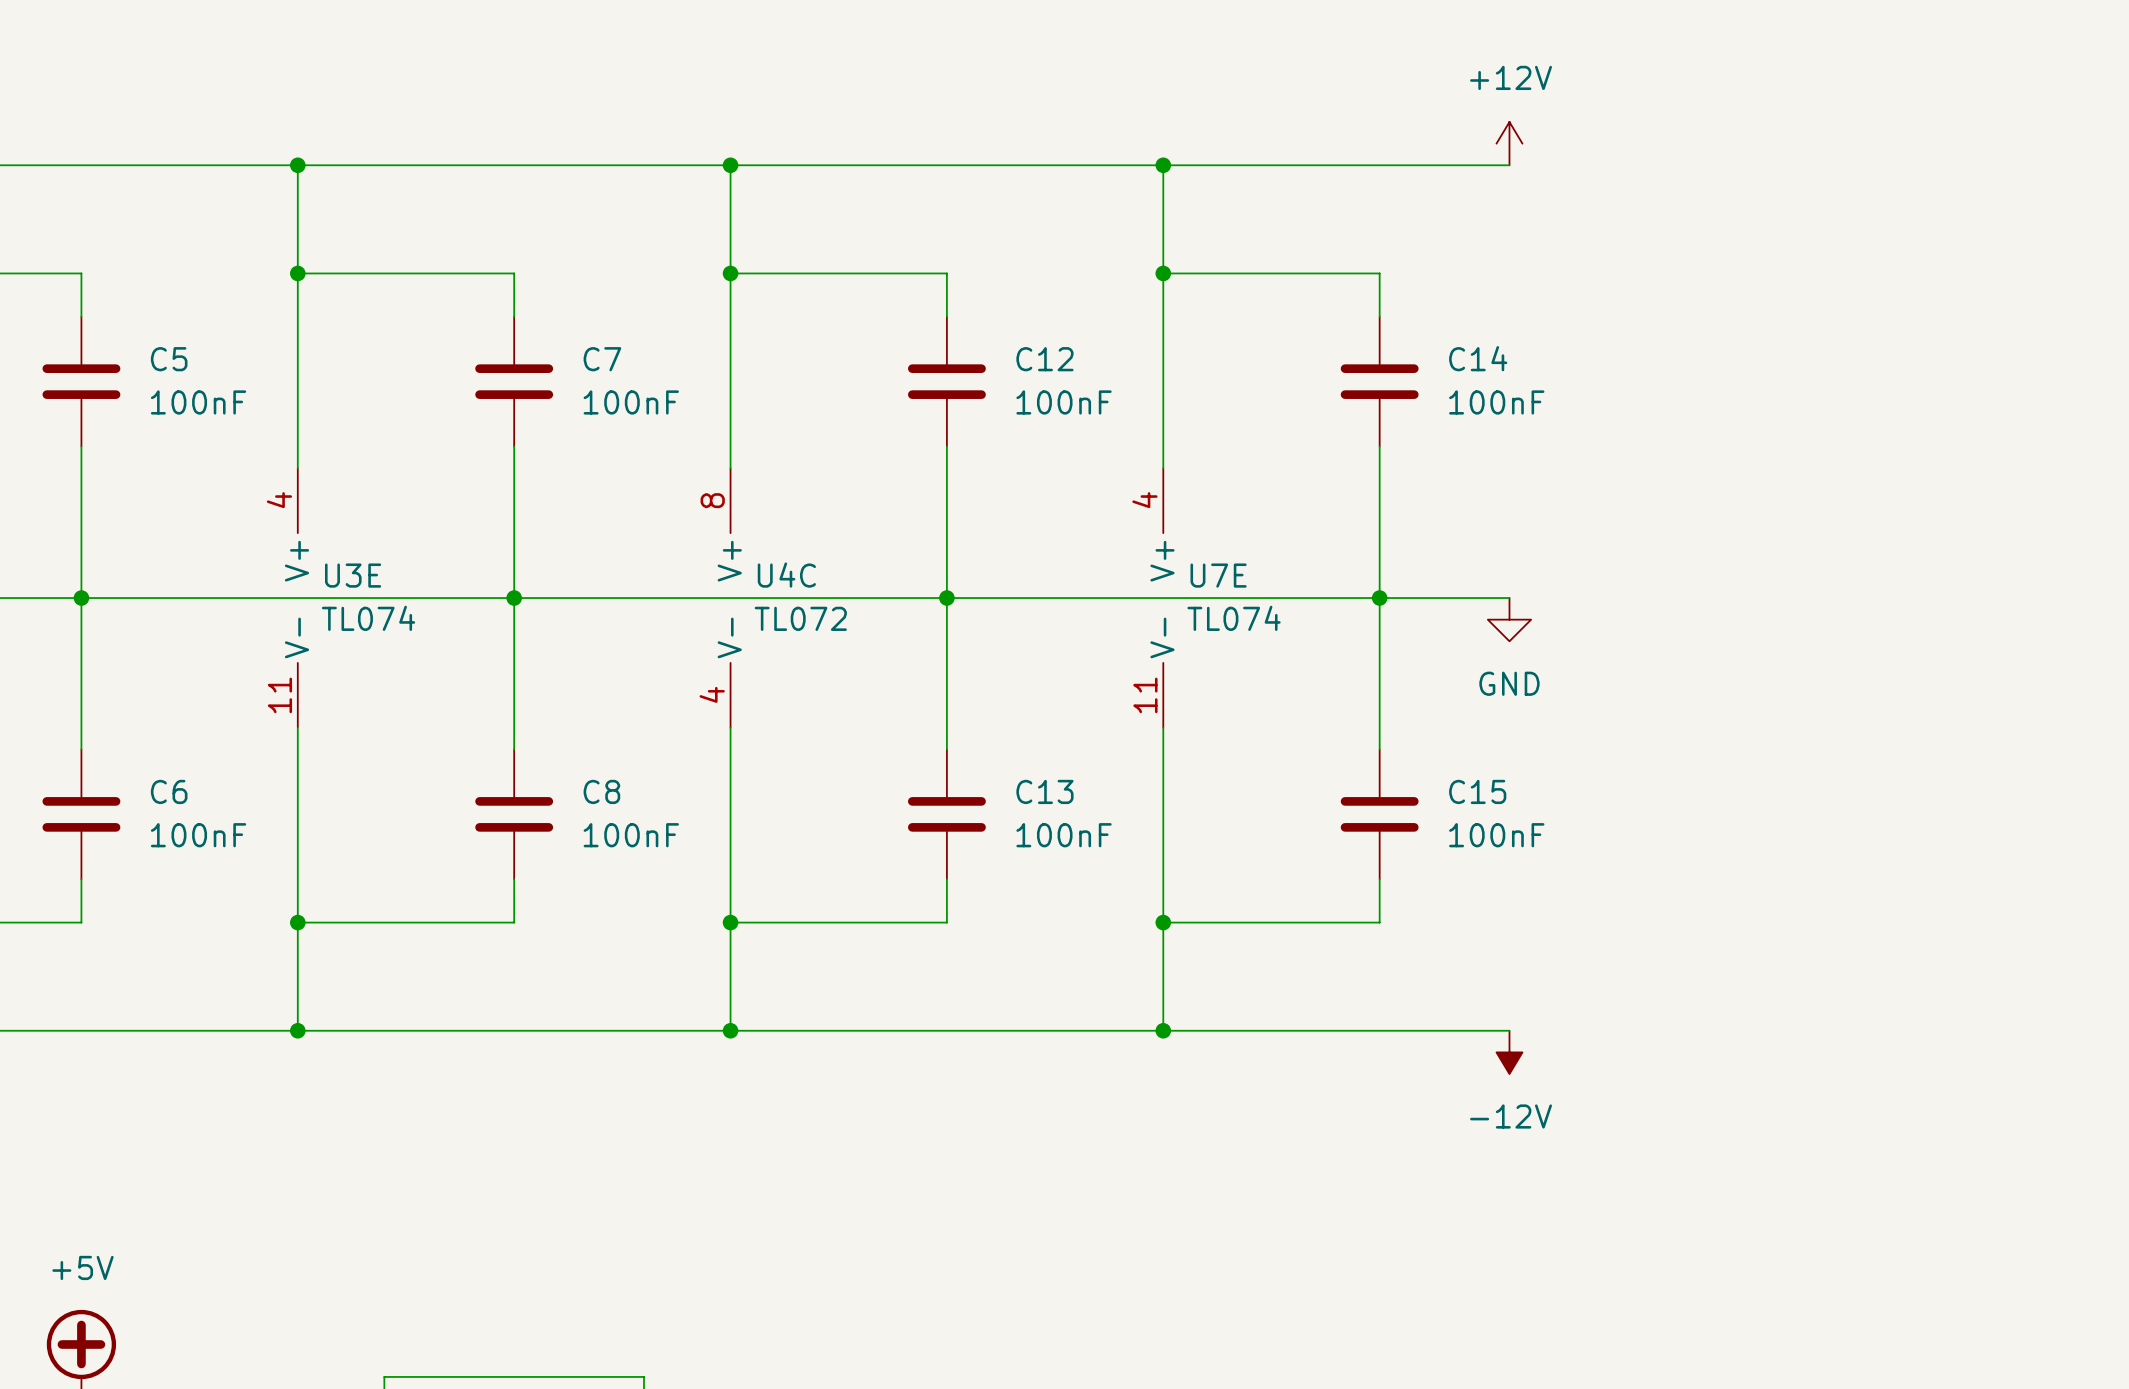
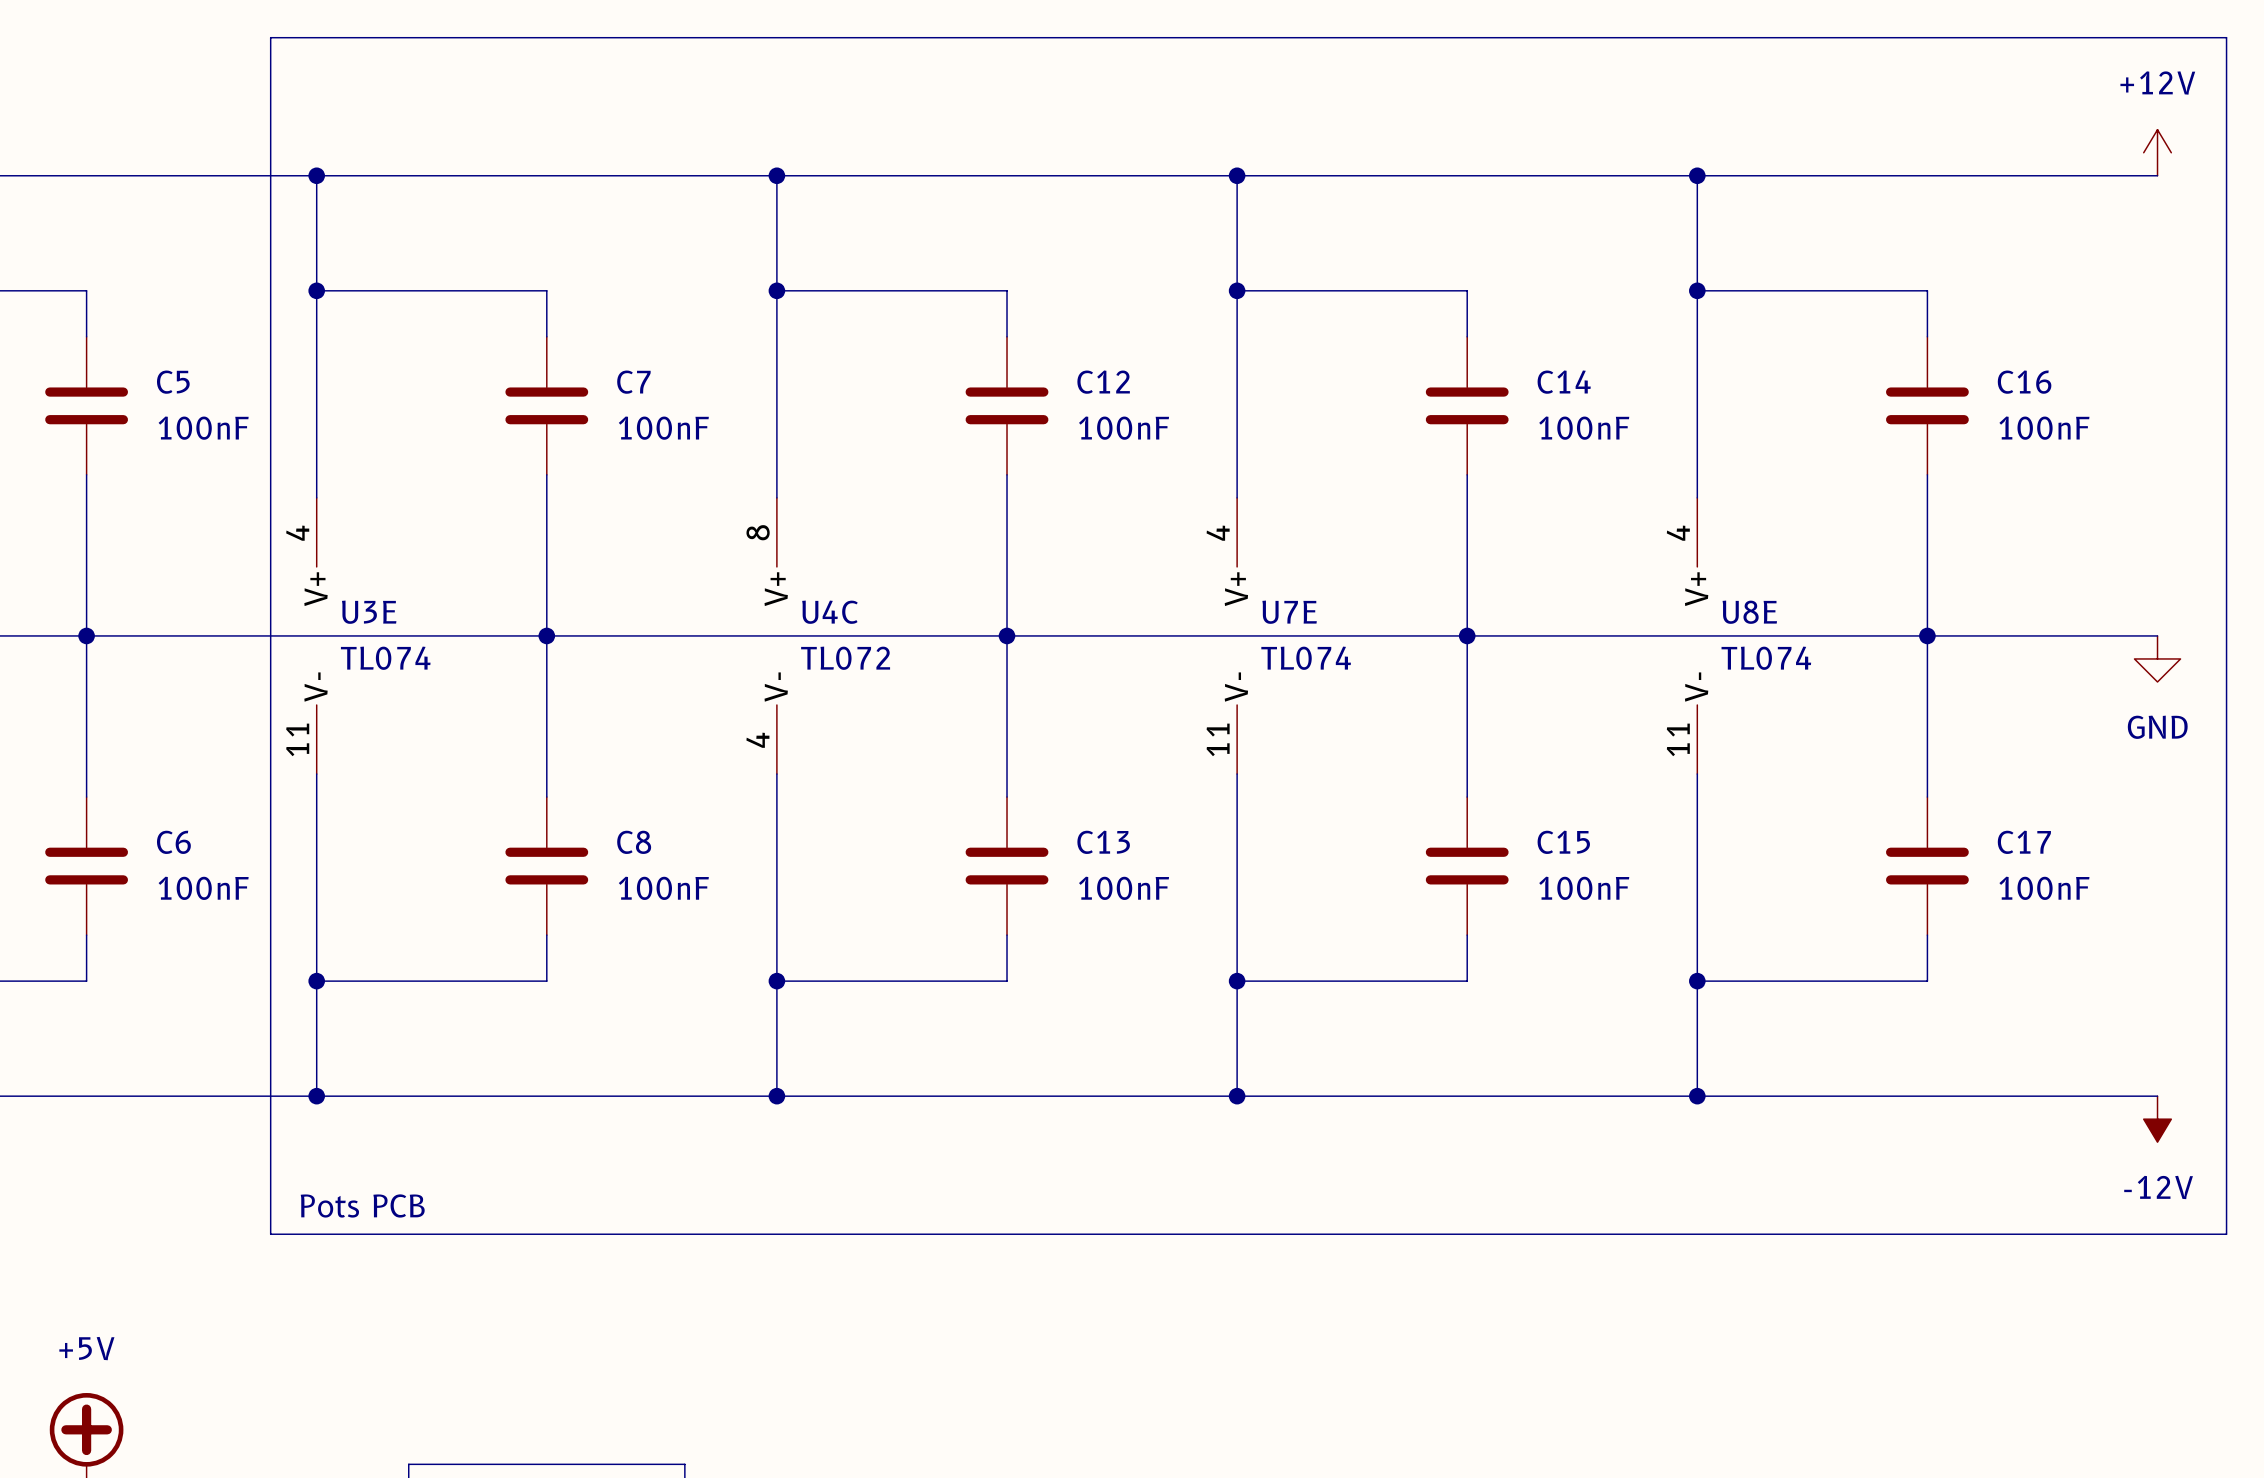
line: none -> (270, 37) (2226, 37) (2226, 1234) (270, 1234) (270, 37)
power symbol: +12V (1509, 143) -> none
power symbol: none -> +12V (2157, 152)
wire: none -> (1605, 175) (2157, 175)
wire: none -> (1697, 175) (1697, 497)
junction: none -> (1697, 175)
wire: none -> (1697, 290) (1927, 290) (1927, 336)
junction: none -> (1697, 290)
C16: none -> 100nF (1927, 405)
wire: none -> (1927, 474) (1927, 797)
wire: none -> (1605, 635) (2157, 635)
U8E: none -> TL074 (1697, 635)
junction: none -> (1927, 635)
power symbol: GND (1509, 619) -> none
power symbol: none -> GND (2157, 658)
wire: none -> (1697, 774) (1697, 1096)
C17: none -> 100nF (1927, 866)
wire: none -> (1927, 935) (1927, 981) (1697, 981)
junction: none -> (1697, 981)
wire: none -> (1605, 1096) (2157, 1096)
junction: none -> (1697, 1096)
power symbol: -12V (1509, 1052) -> none
power symbol: none -> -12V (2157, 1119)
text: none -> Pots PCB (362, 1205)

